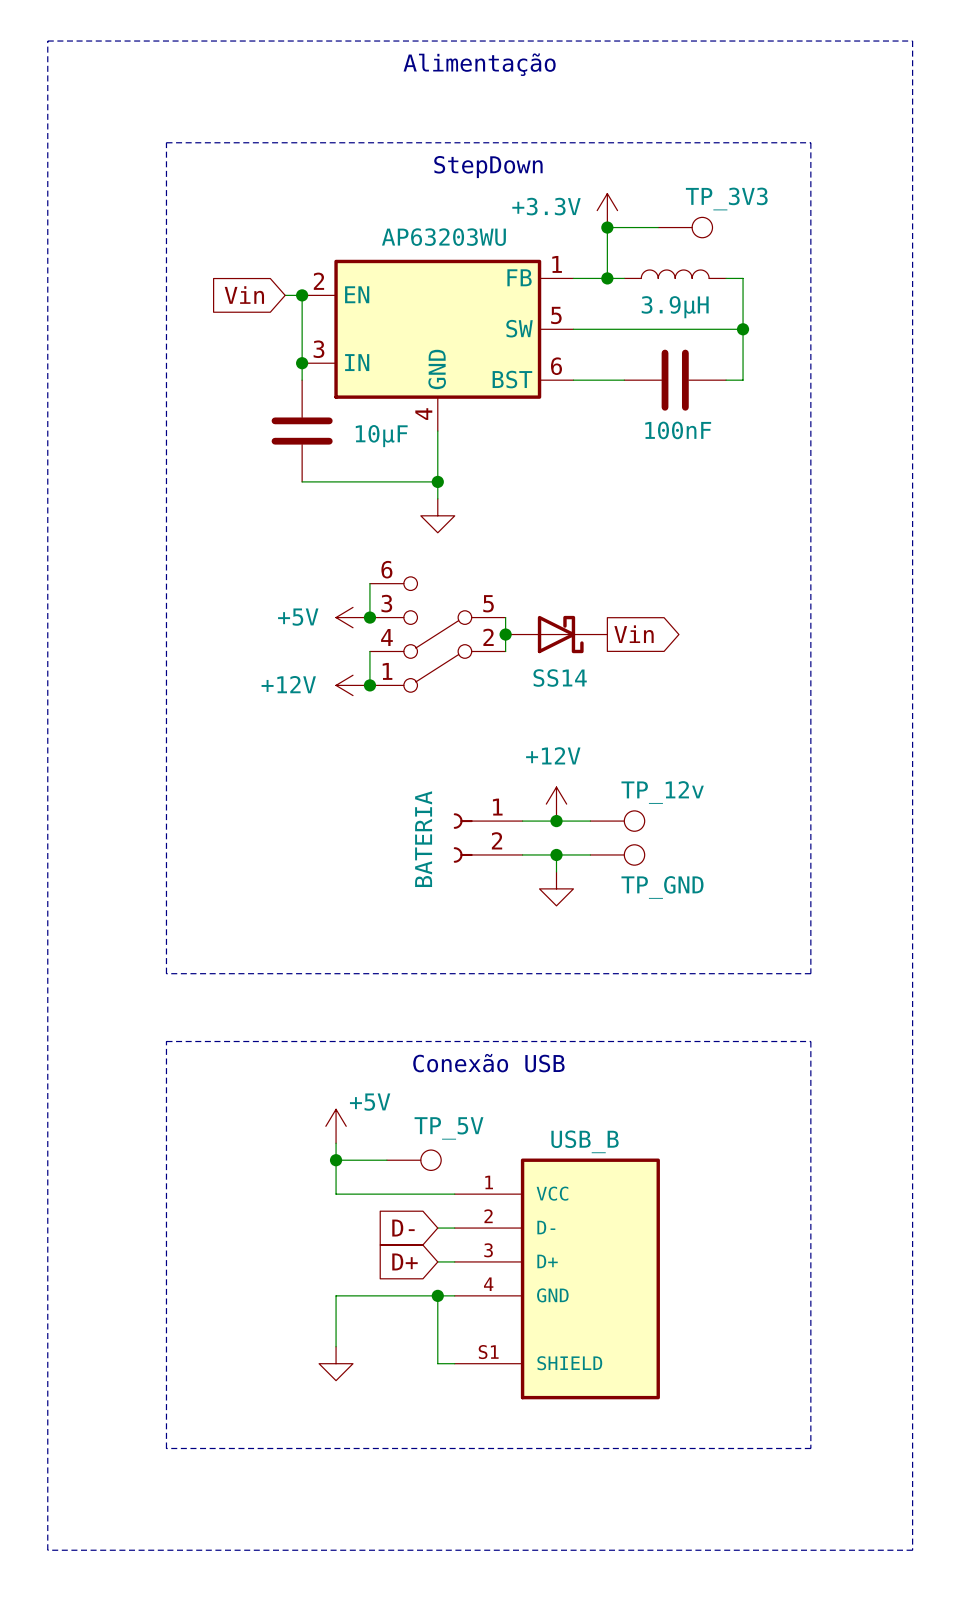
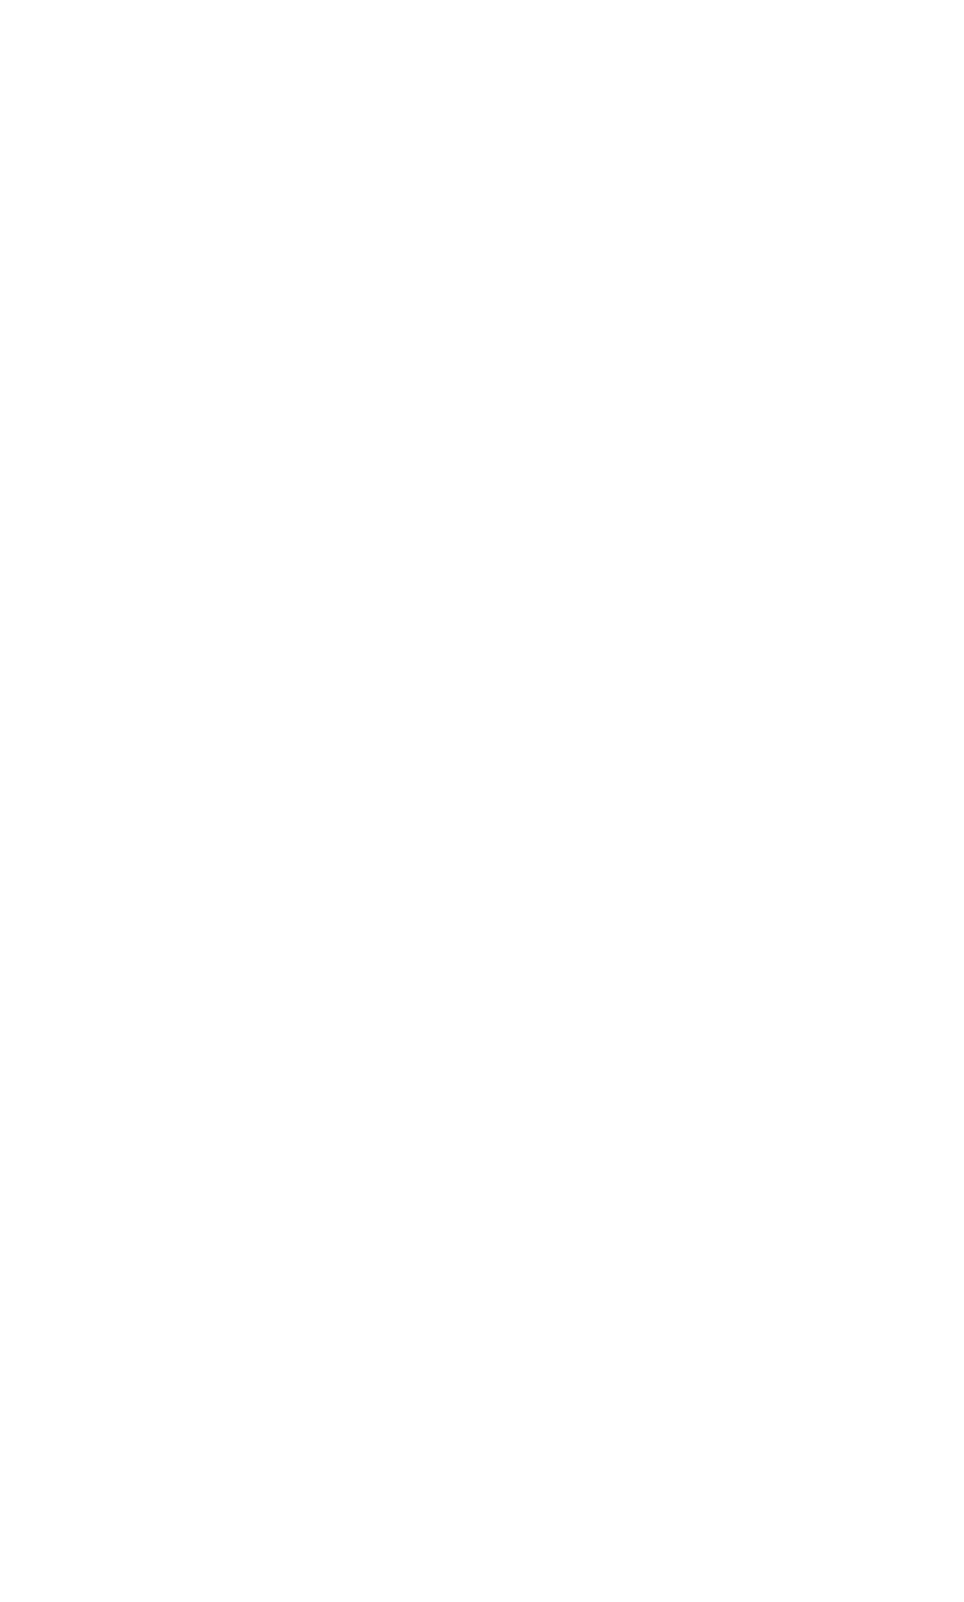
line: (47, 41) (912, 41) (912, 1550) (47, 1550) (47, 41) -> none
text: Alimentação (479, 64) -> none
line: (166, 142) (810, 142) (810, 973) (166, 973) (166, 142) -> none
text: StepDown (488, 167) -> none
power symbol: +3.3V (607, 210) -> none
junction: (607, 227) -> none
wire: (658, 227) (607, 227) (607, 278) -> none
part: TP_3V3 (685, 227) -> none
part: 3.9µH (675, 274) -> none
wire: (573, 278) (624, 278) -> none
junction: (607, 278) -> none
wire: (726, 278) (743, 278) (743, 380) (726, 380) -> none
global label: Vin (244, 295) -> none
wire: (285, 295) (302, 295) (302, 380) -> none
junction: (302, 295) -> none
wire: (573, 329) (743, 329) -> none
junction: (743, 329) -> none
part: AP63203WU (437, 345) -> none
junction: (302, 363) -> none
wire: (573, 380) (624, 380) -> none
part: 100nF (675, 380) -> none
part: 10µF (302, 431) -> none
wire: (437, 431) (437, 498) -> none
wire: (302, 481) (437, 481) -> none
junction: (437, 481) -> none
power symbol: (437, 515) -> none
wire: (369, 583) (369, 617) -> none
power symbol: +5V (353, 617) -> none
junction: (369, 617) -> none
part: (437, 617) -> none
wire: (505, 617) (505, 651) -> none
junction: (505, 634) -> none
part: SS14 (556, 634) -> none
global label: Vin (634, 634) -> none
wire: (369, 651) (369, 685) -> none
part: (437, 651) -> none
power symbol: +12V (353, 685) -> none
junction: (369, 685) -> none
power symbol: +12V (556, 804) -> none
wire: (522, 821) (590, 821) -> none
junction: (556, 821) -> none
part: TP_12v (617, 821) -> none
part: BATERIA (488, 838) -> none
wire: (522, 854) (590, 854) -> none
wire: (556, 854) (556, 871) -> none
junction: (556, 854) -> none
part: TP_GND (617, 854) -> none
power symbol: (556, 888) -> none
line: (166, 1041) (166, 1448) (810, 1448) (810, 1041) (166, 1041) -> none
text: Conexão USB (488, 1063) -> none
power symbol: +5V (336, 1126) -> none
wire: (336, 1143) (336, 1194) (454, 1194) -> none
wire: (336, 1160) (386, 1160) -> none
junction: (336, 1160) -> none
part: TP_5V (414, 1160) -> none
global label: D- (403, 1228) -> none
wire: (437, 1228) (454, 1228) -> none
global label: D+ (404, 1261) -> none
wire: (437, 1261) (454, 1261) -> none
part: USB_B (557, 1278) -> none
wire: (437, 1295) (437, 1363) (454, 1363) -> none
junction: (437, 1295) -> none
wire: (454, 1295) (336, 1295) (336, 1346) -> none
power symbol: (336, 1363) -> none

